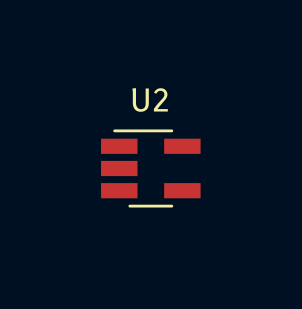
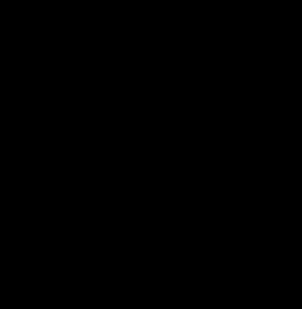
U2: (150, 168) -> none

